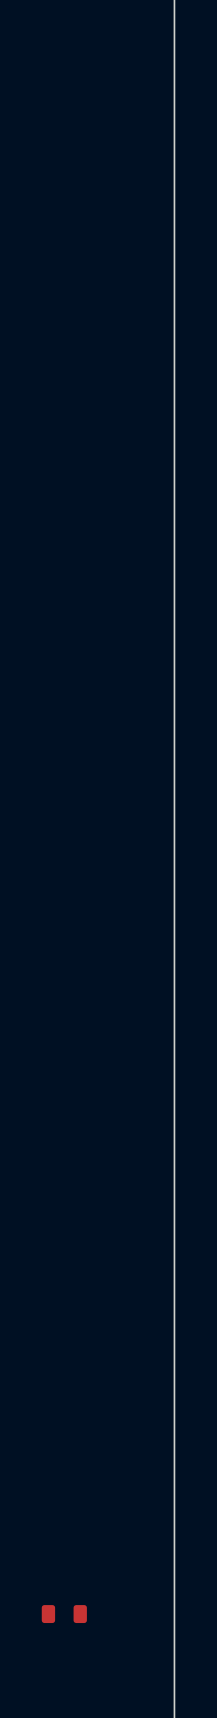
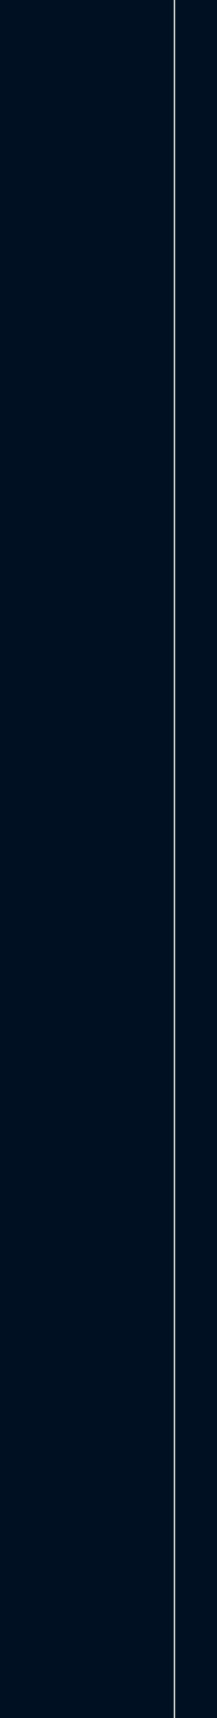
part: (64, 1614) -> none

